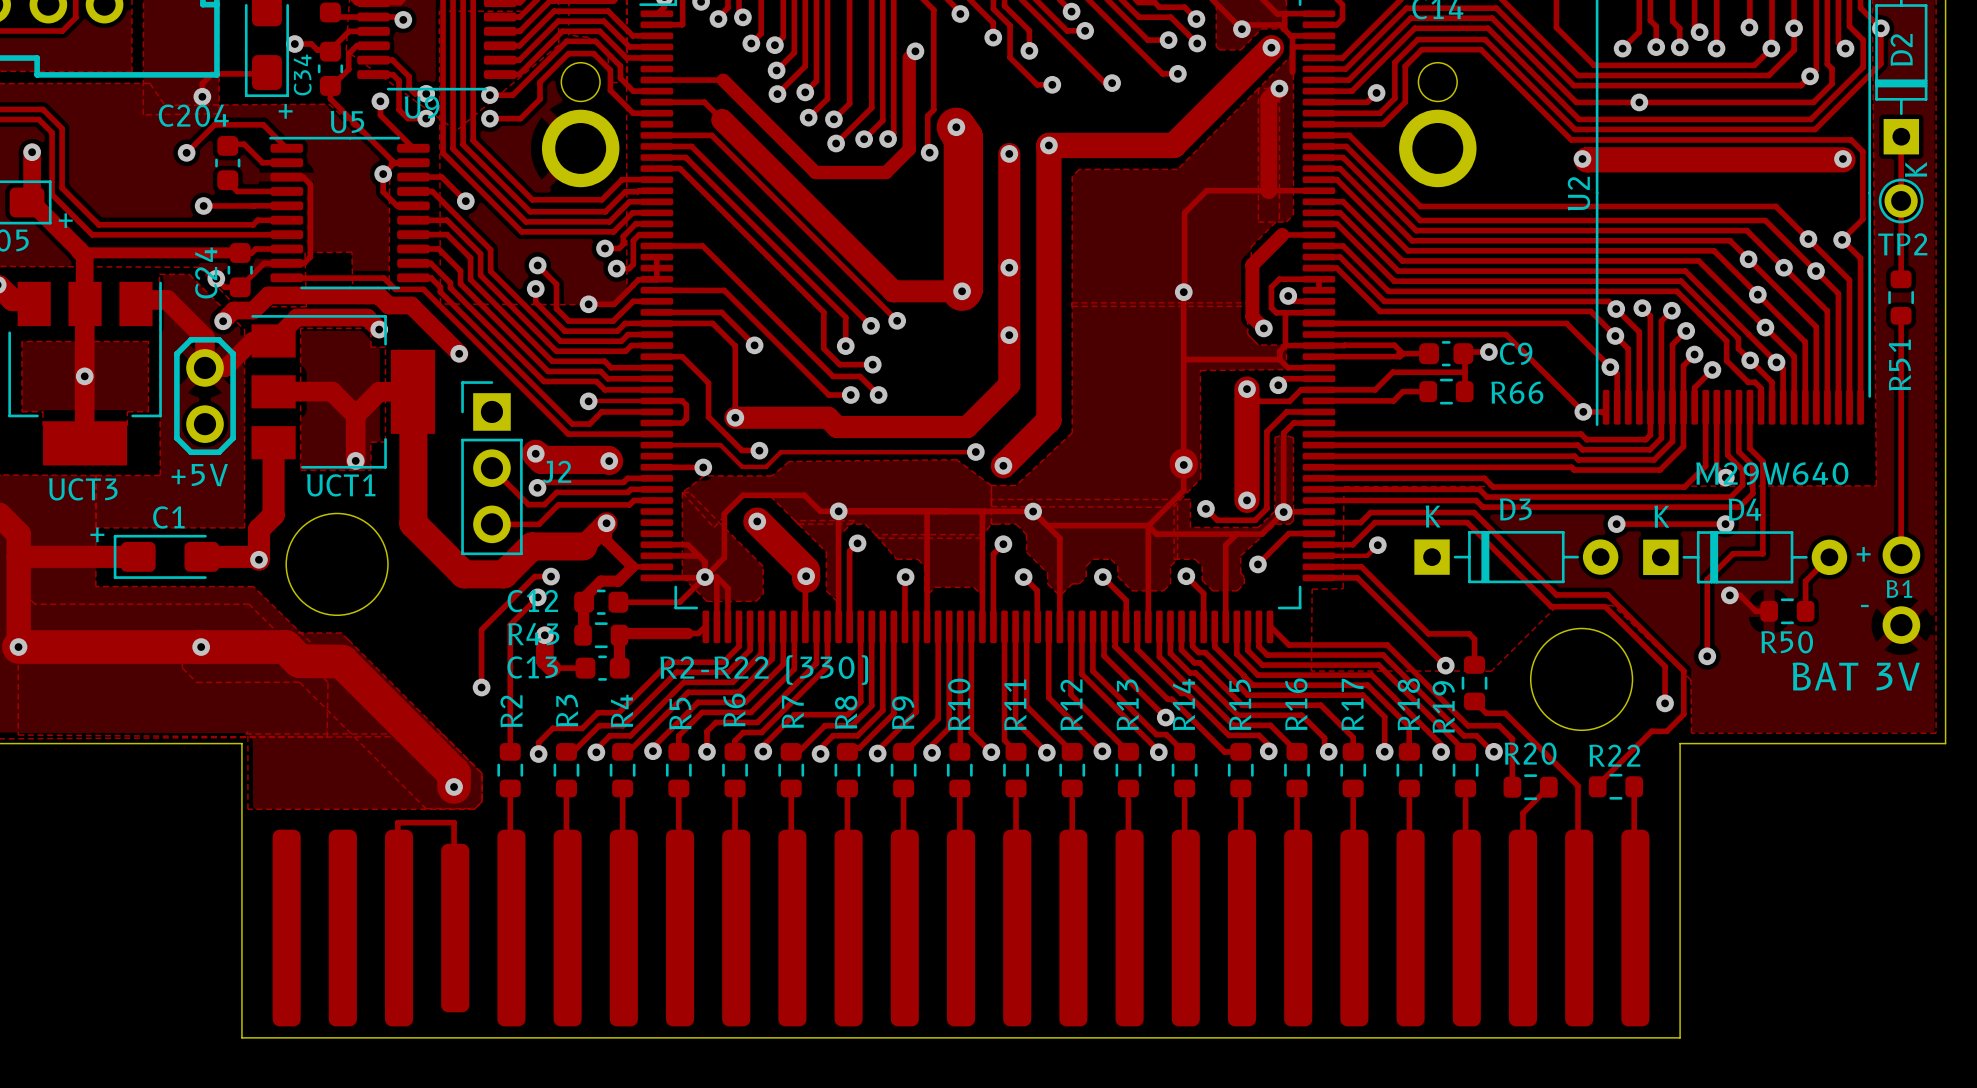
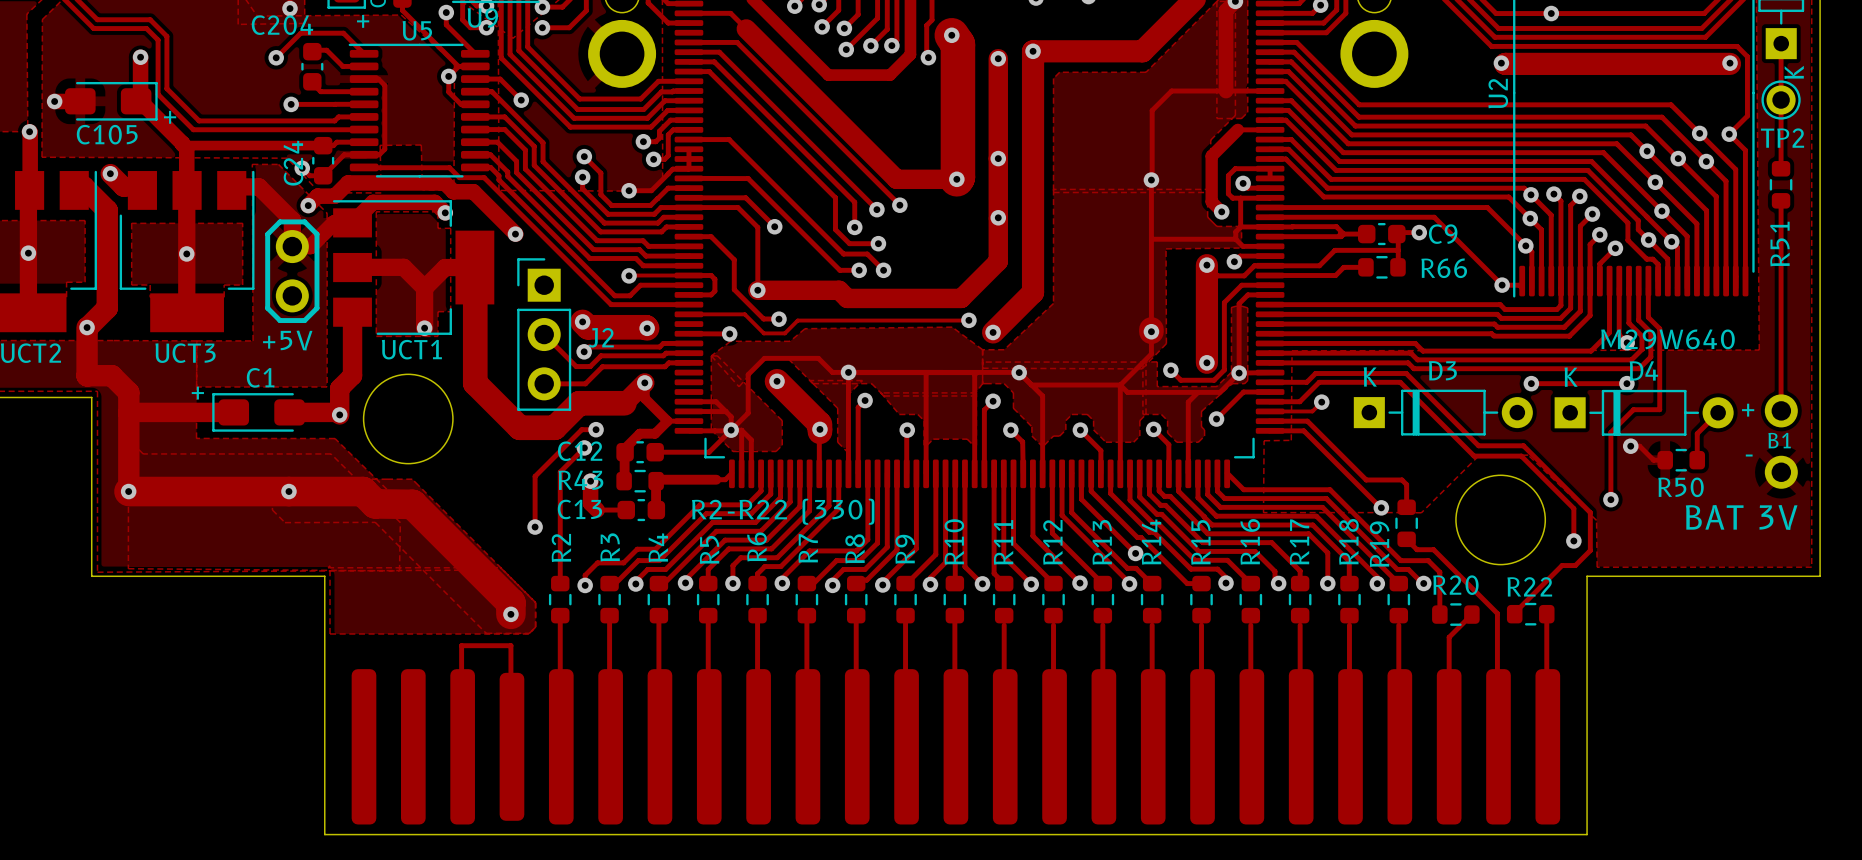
part footprint: [272, 829, 1650, 1027] -> [351, 669, 1561, 825]

